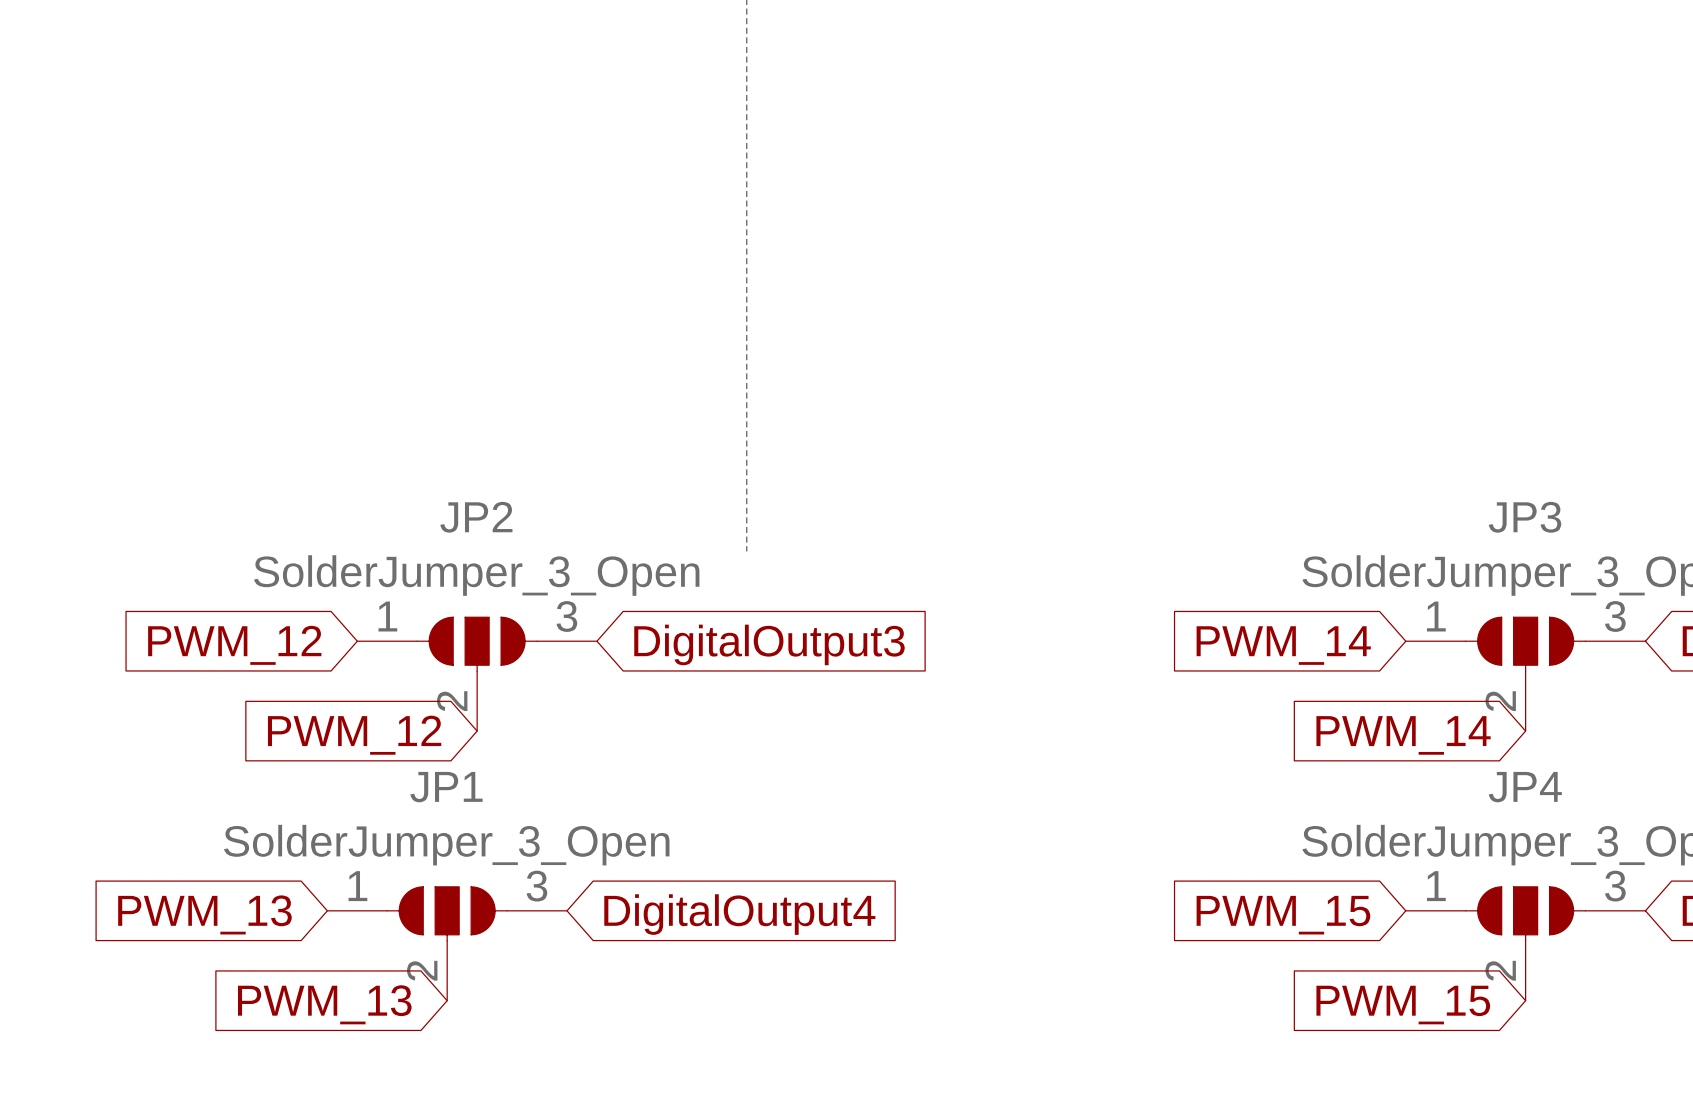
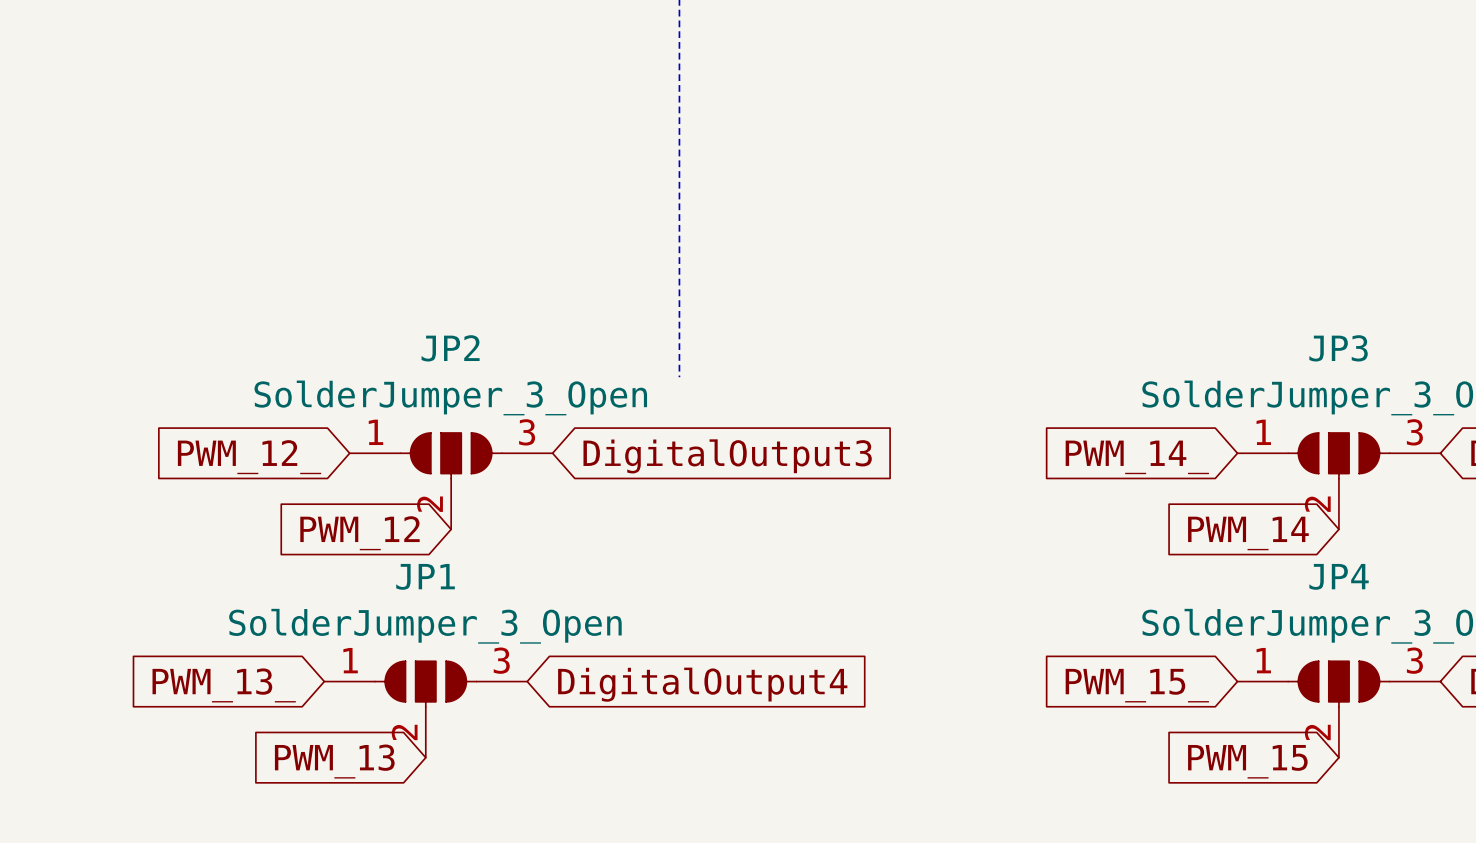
global label: PWM_12 (234, 645) -> PWM_12_ (249, 457)
global label: PWM_14 (1283, 645) -> PWM_14_ (1137, 457)
global label: PWM_13 (204, 914) -> PWM_13_ (224, 685)
global label: PWM_15 (1283, 915) -> PWM_15_ (1137, 685)

